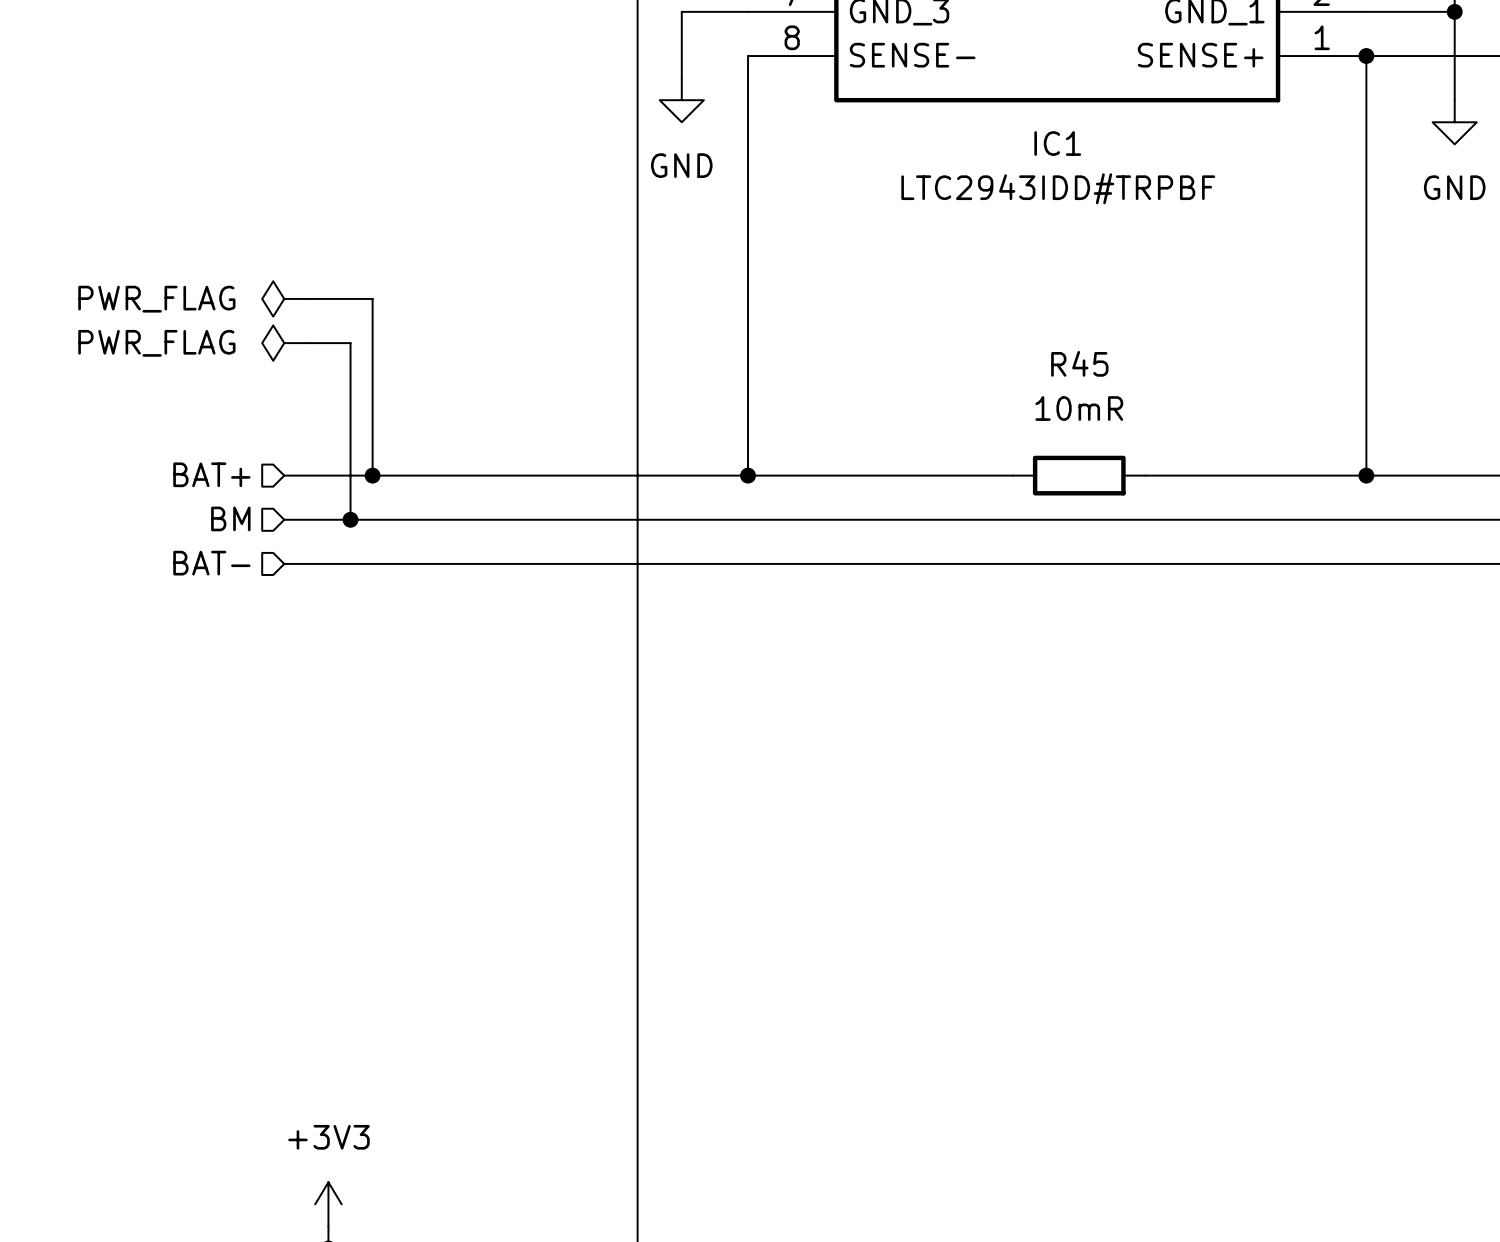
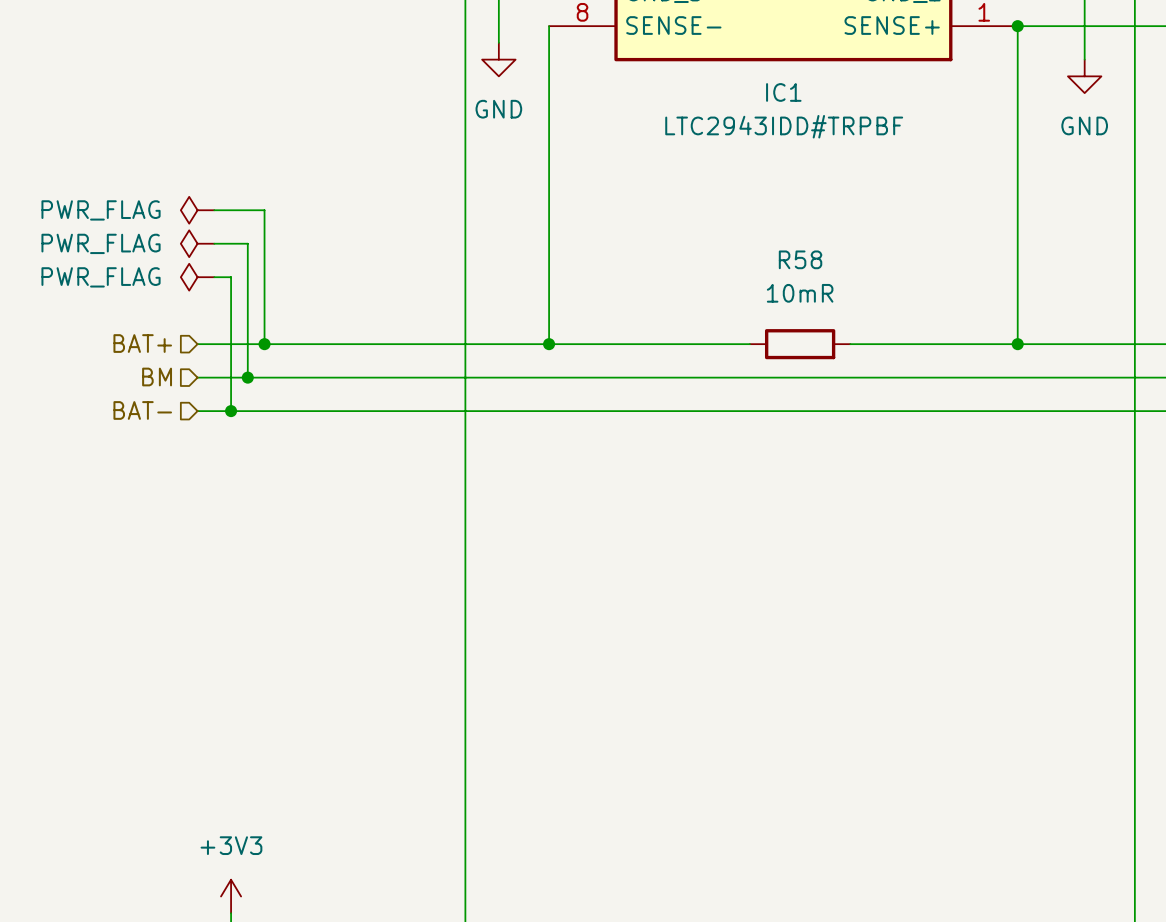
R45 name: R45 (1079, 363) -> R58 (800, 259)
power symbol: none -> PWR_FLAG (197, 277)
wire: none -> (214, 277) (231, 277) (231, 411)
junction: none -> (231, 411)

